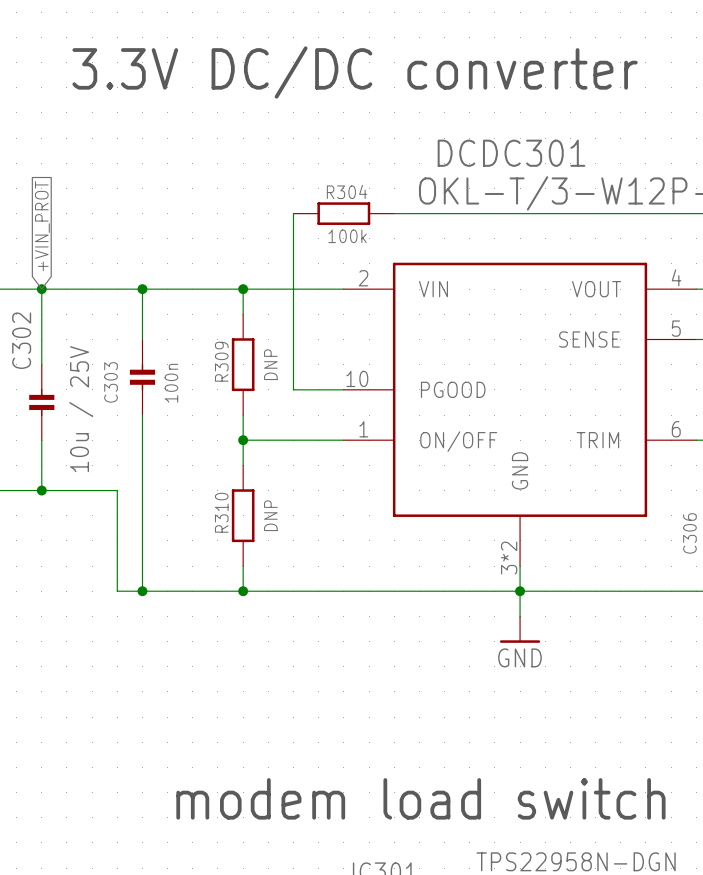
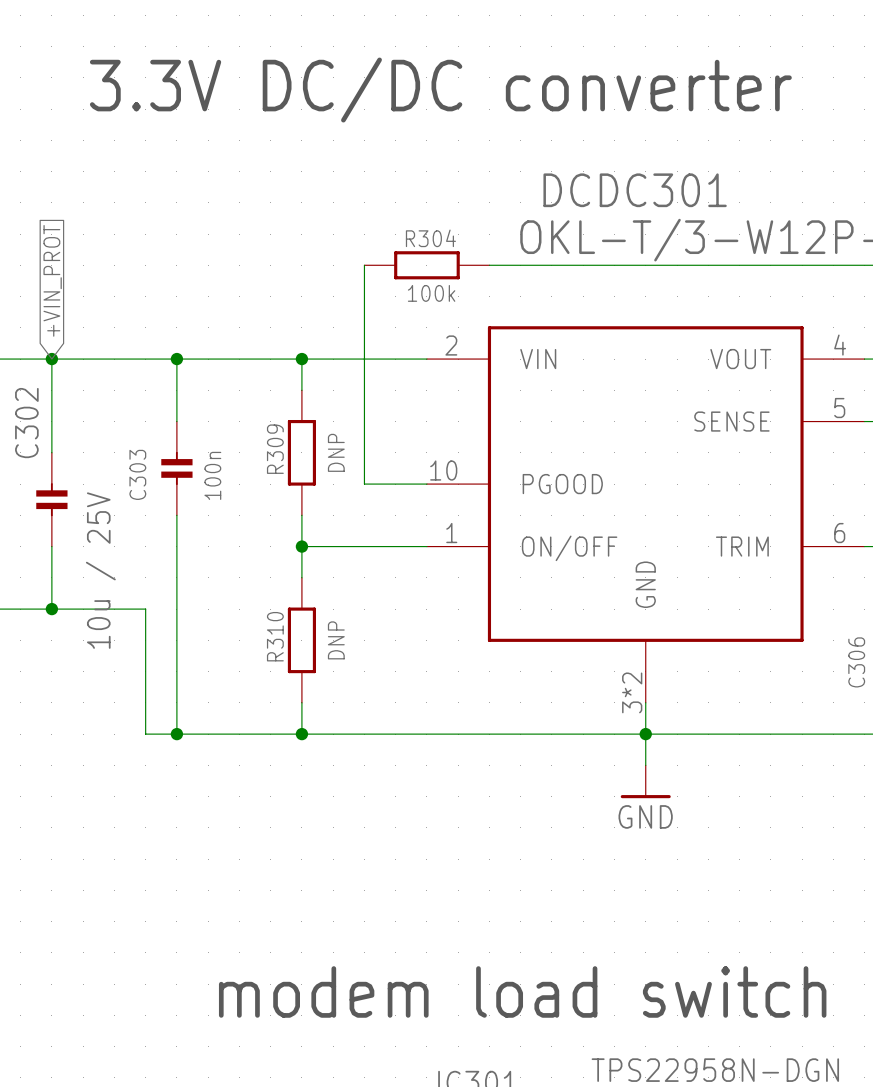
C302 value position: 10u / 25V (81, 409) -> 10u / 25V (100, 570)

